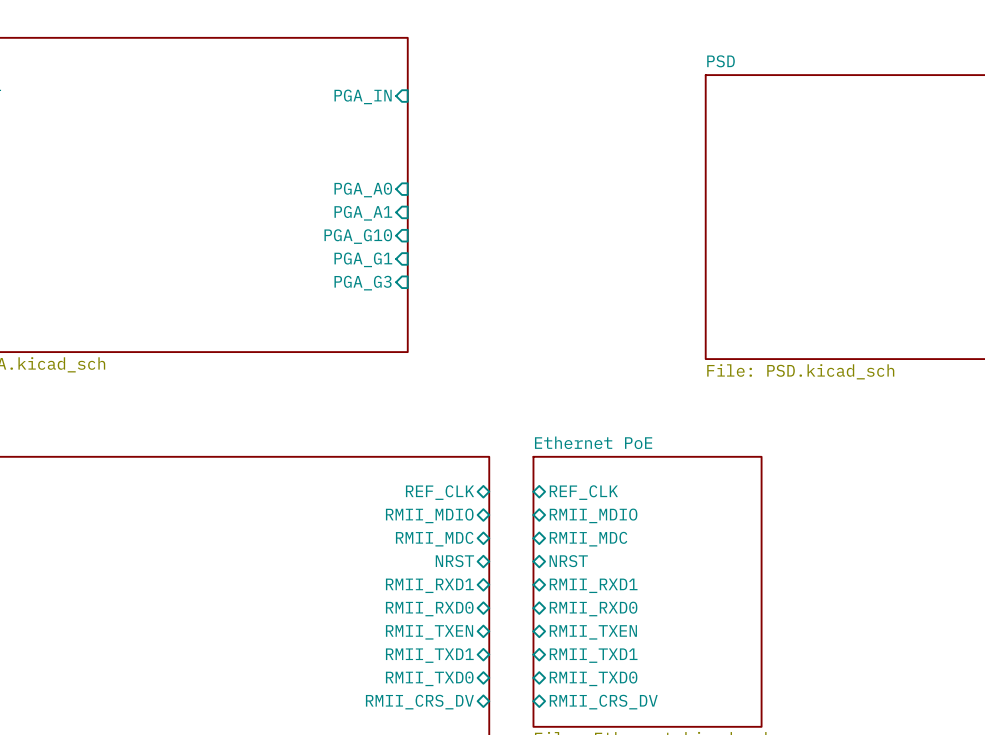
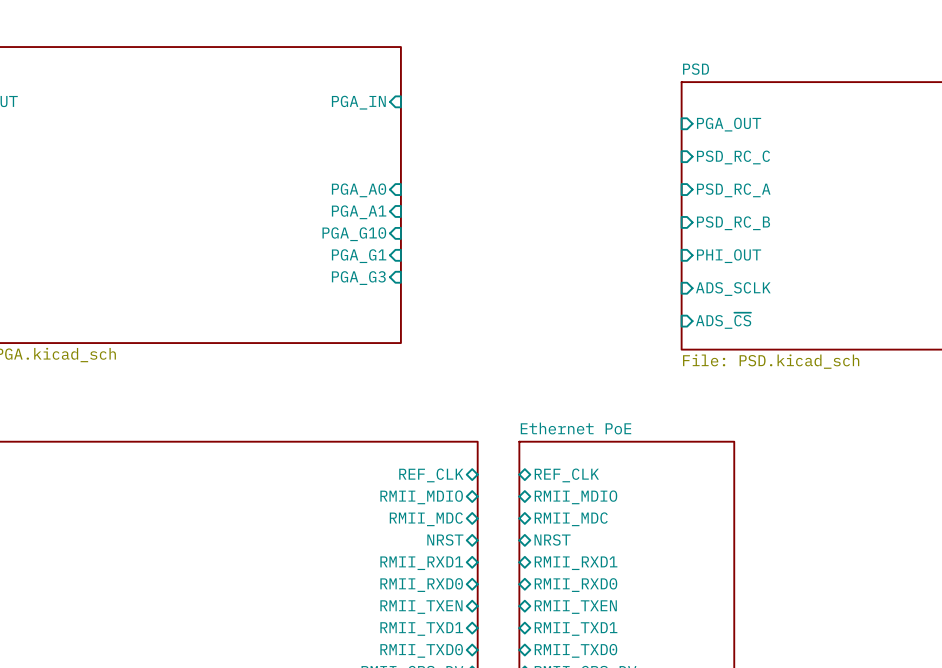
sheet pin: none -> PGA_OUT (729, 124)
sheet pin: none -> PSD_RC_C (733, 157)
sheet pin: none -> PSD_RC_A (733, 190)
sheet pin: none -> PSD_RC_B (733, 223)
sheet pin: none -> PHI_OUT (729, 256)
sheet pin: none -> ADS_SCLK (733, 289)
sheet pin: none -> ADS_~{CS} (723, 320)

